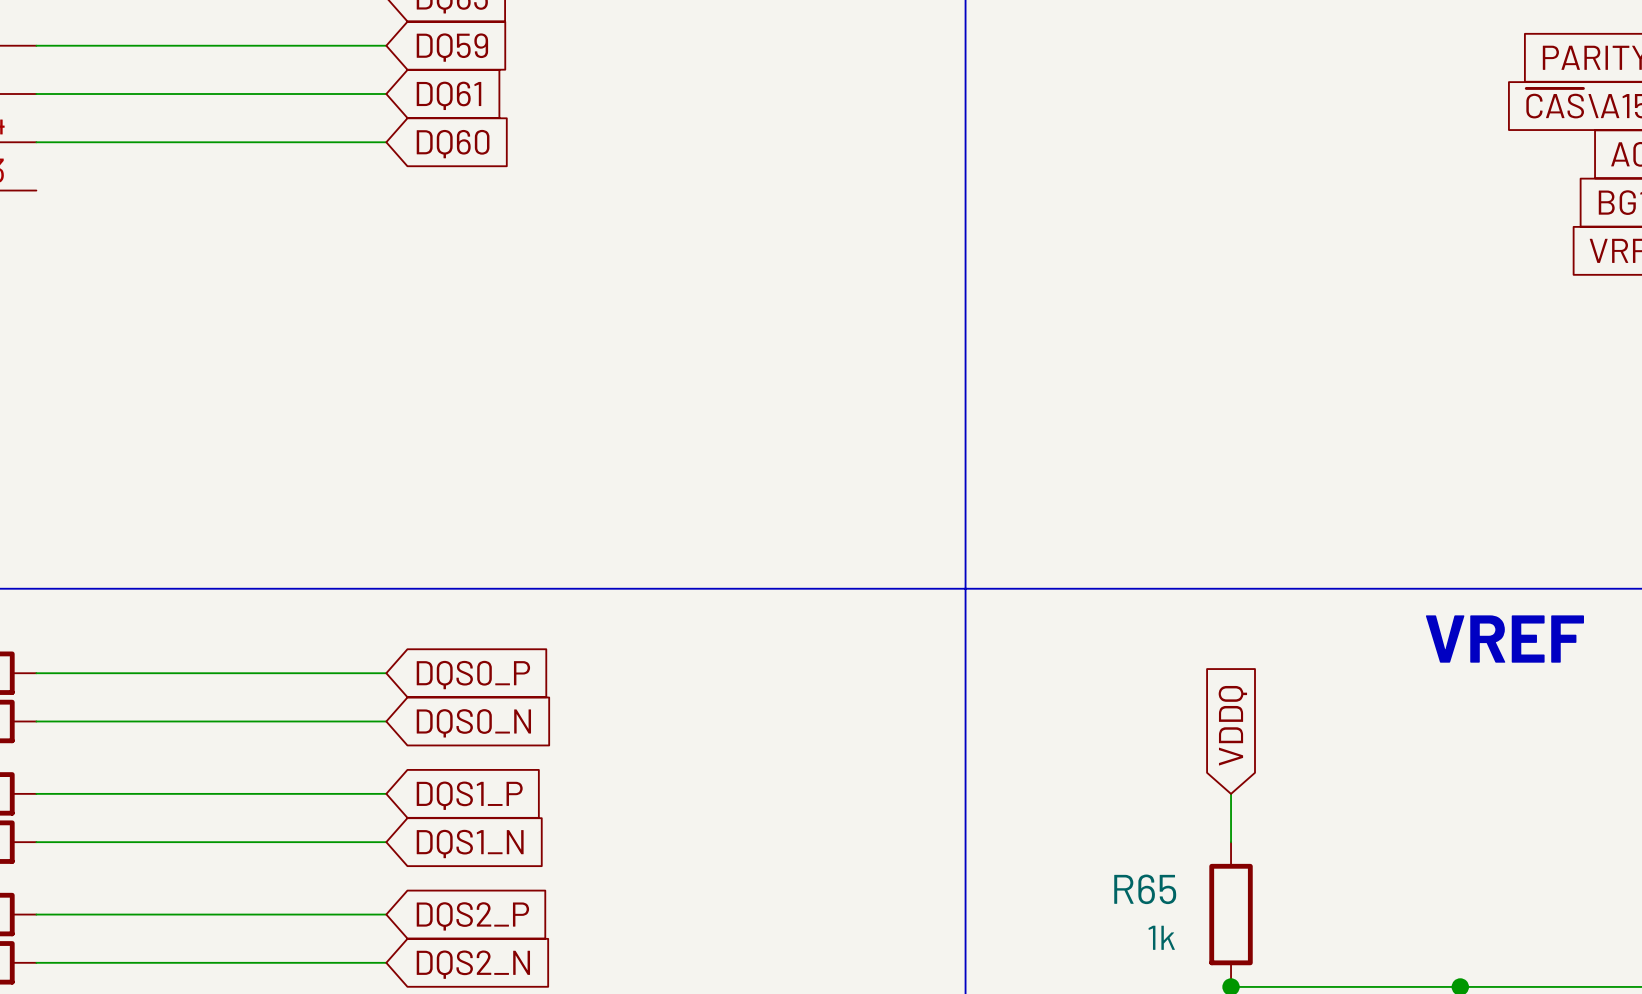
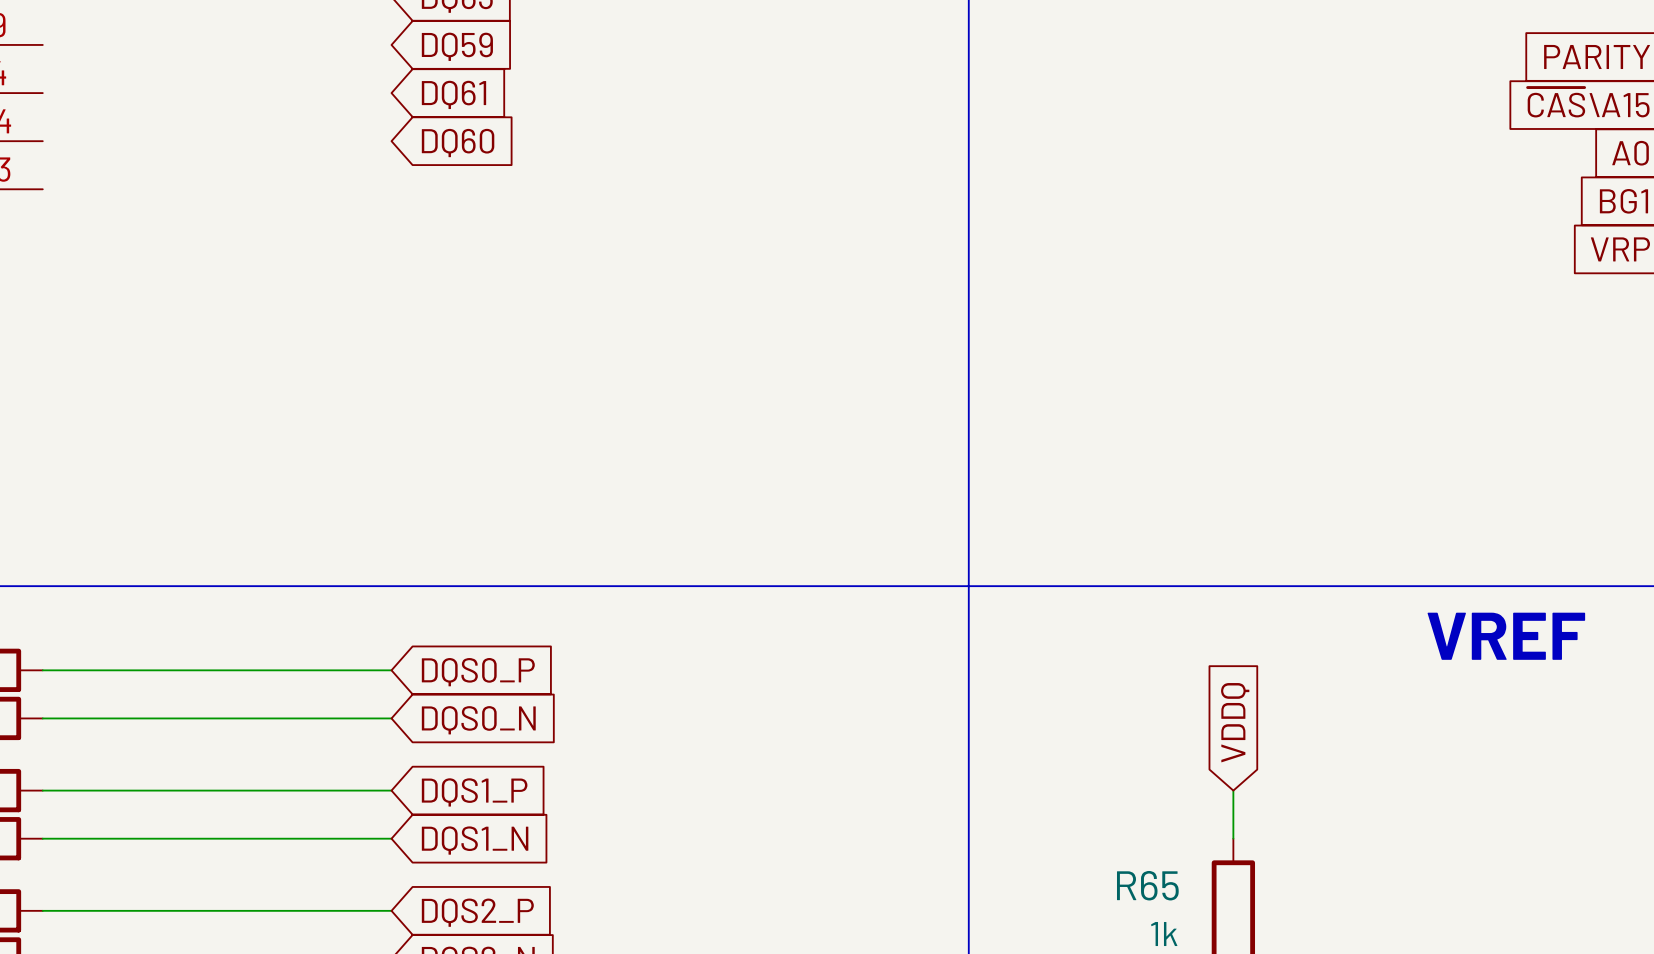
wire: (36, 45) (386, 45) -> none
wire: (36, 94) (386, 94) -> none
wire: (36, 142) (386, 142) -> none

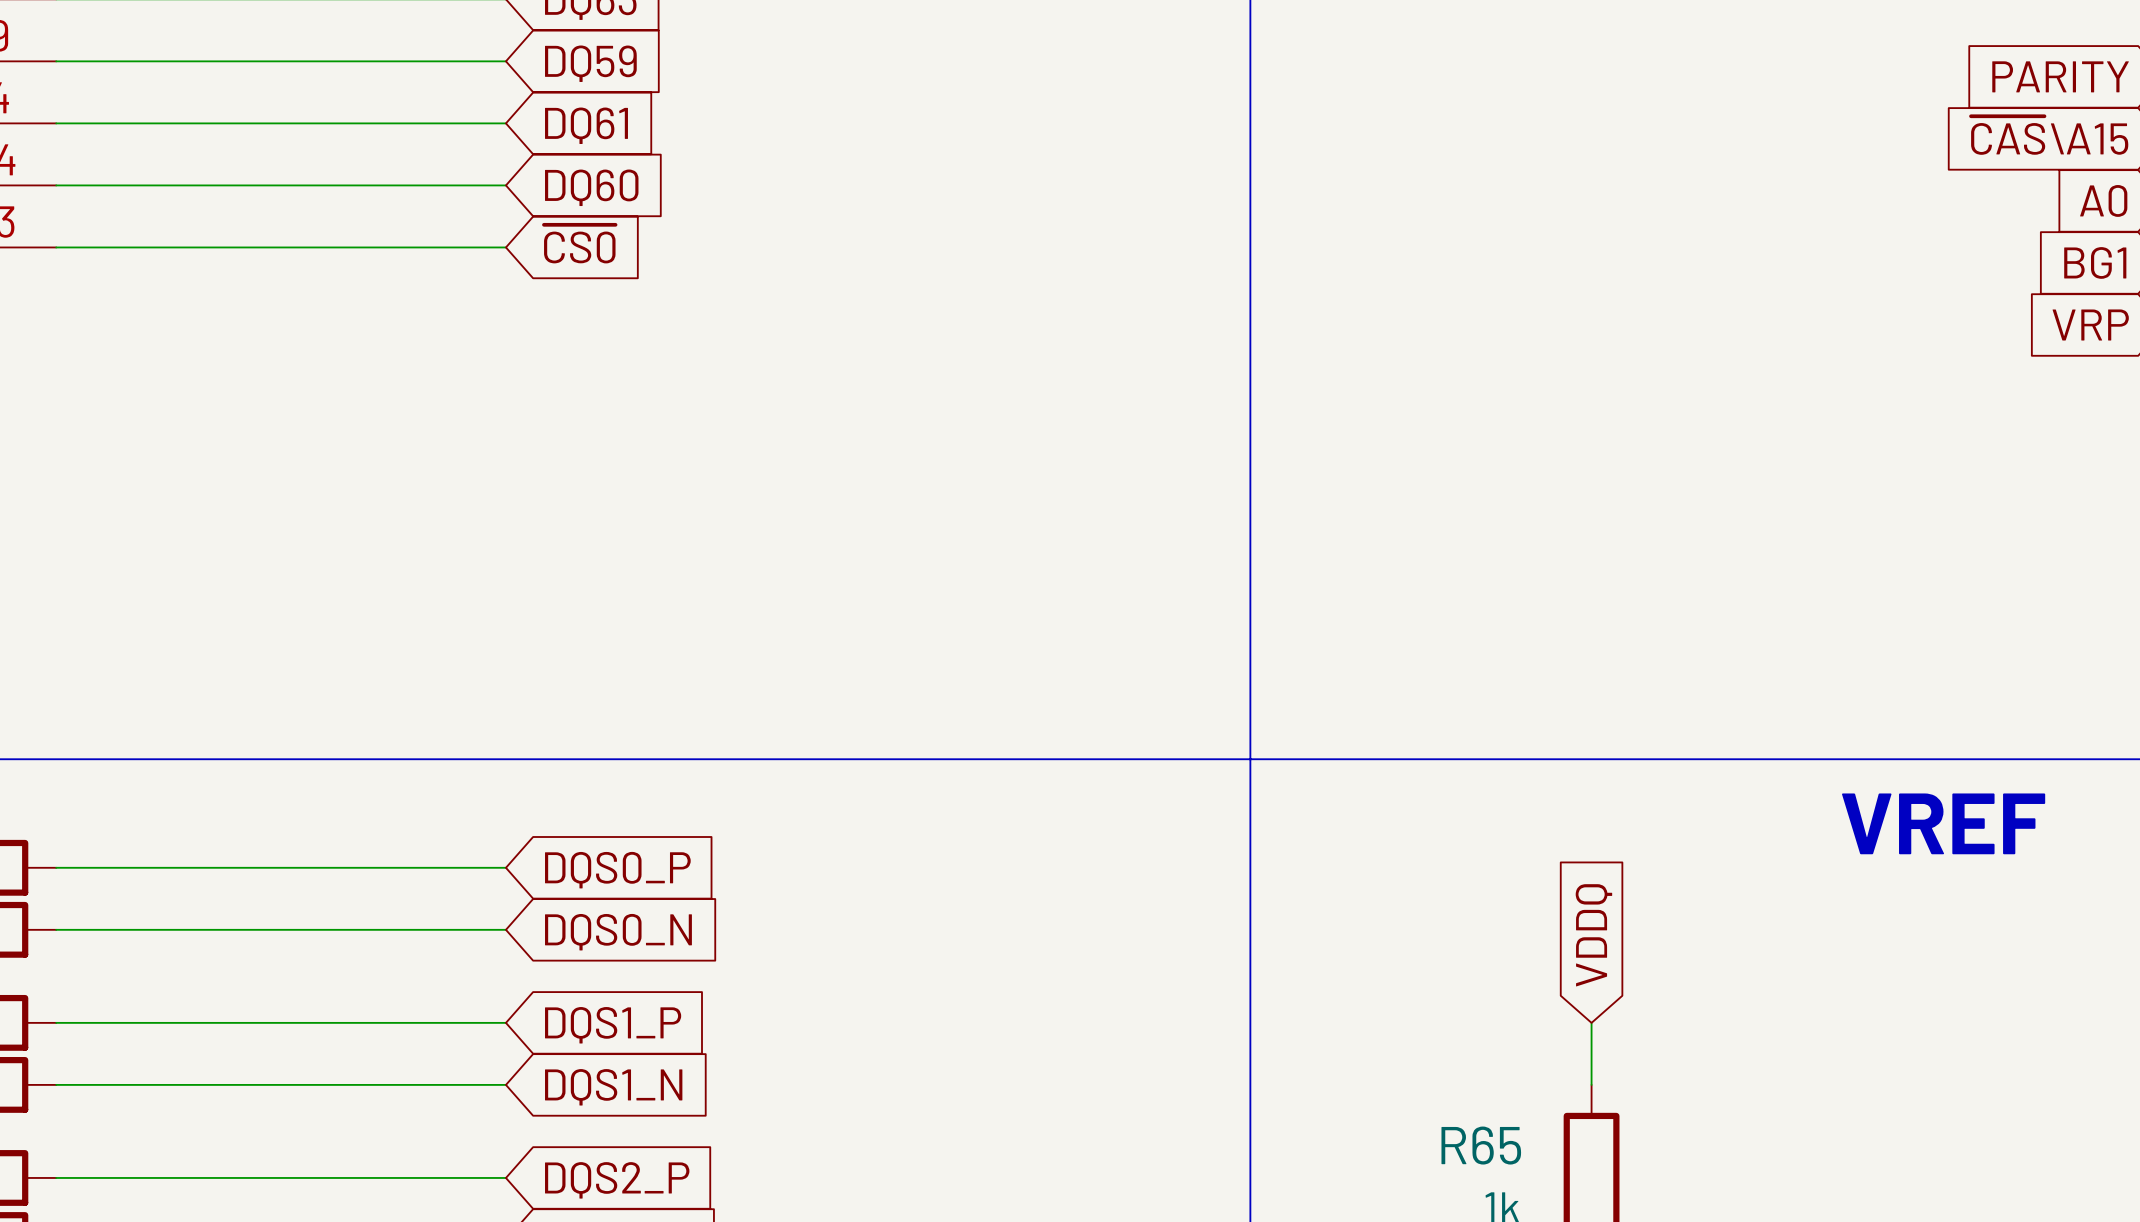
wire: none -> (56, 61) (505, 61)
wire: none -> (56, 123) (505, 123)
wire: none -> (56, 185) (505, 185)
global label: none -> ~{CS0} (579, 244)
wire: none -> (56, 247) (505, 247)

